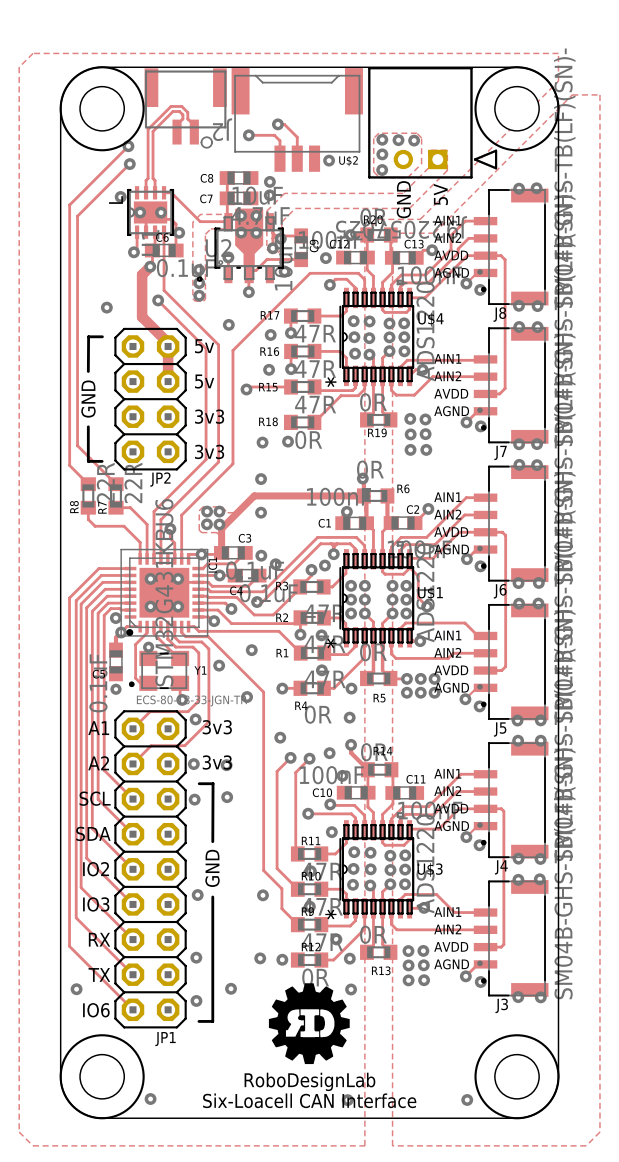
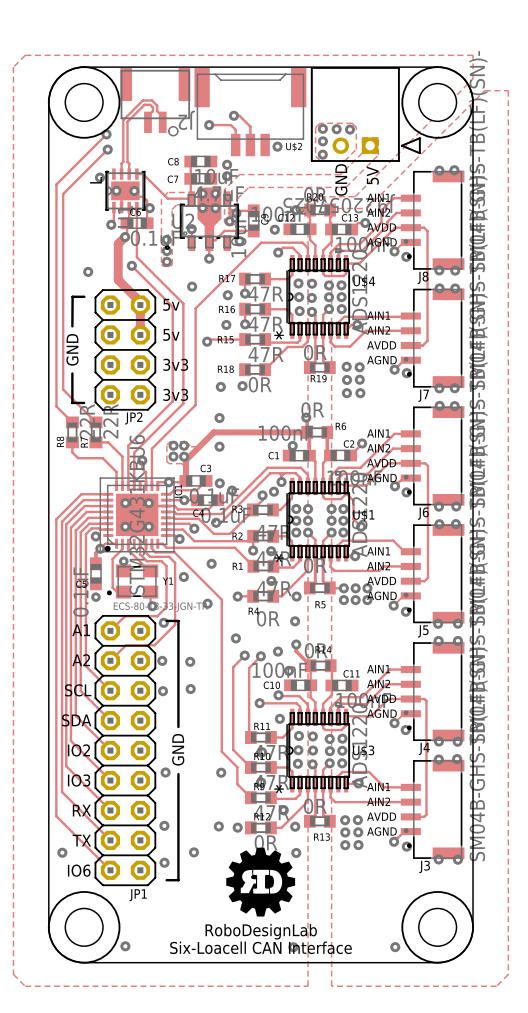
text: 3v3 (217, 727) -> none
text: 3v3 (217, 762) -> none
line: (199, 783) (213, 783) (212, 841) -> (166, 620) (178, 620) (178, 727)

